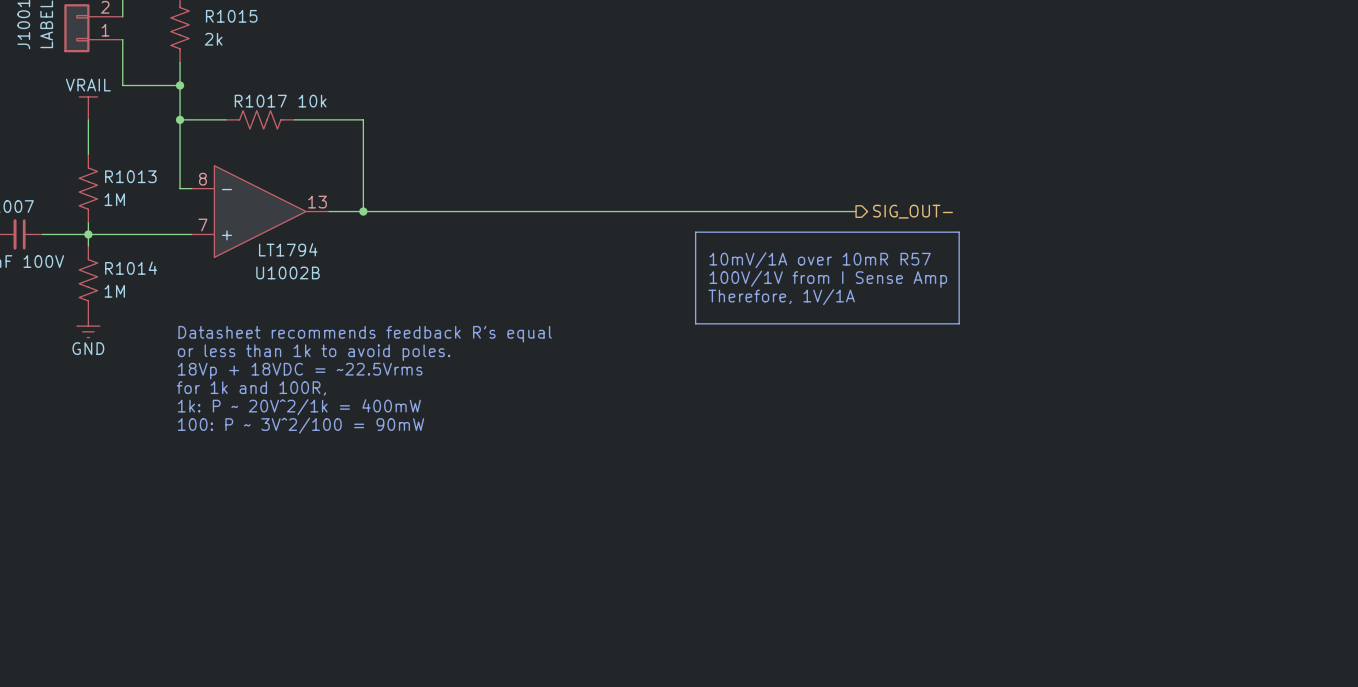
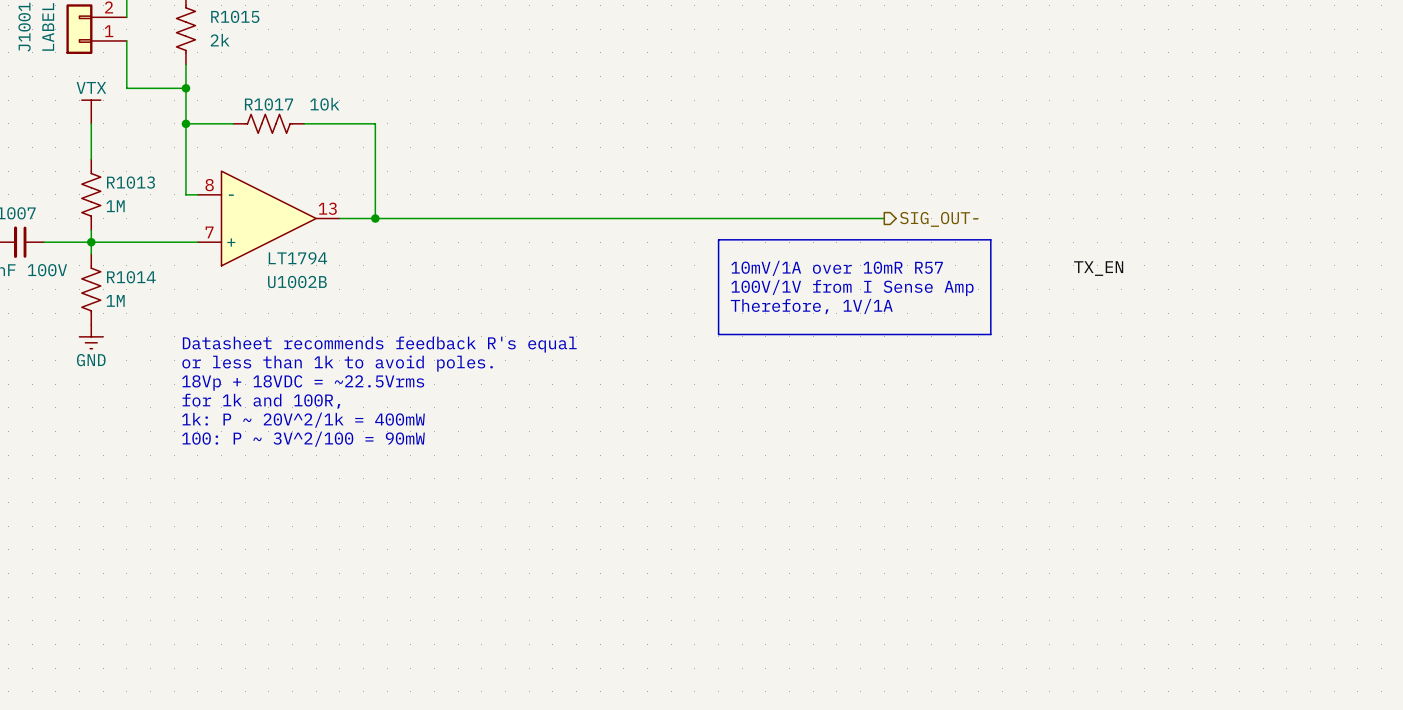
power symbol: VRAIL (88, 108) -> VTX (91, 111)
label: none -> TX_EN (1098, 268)

